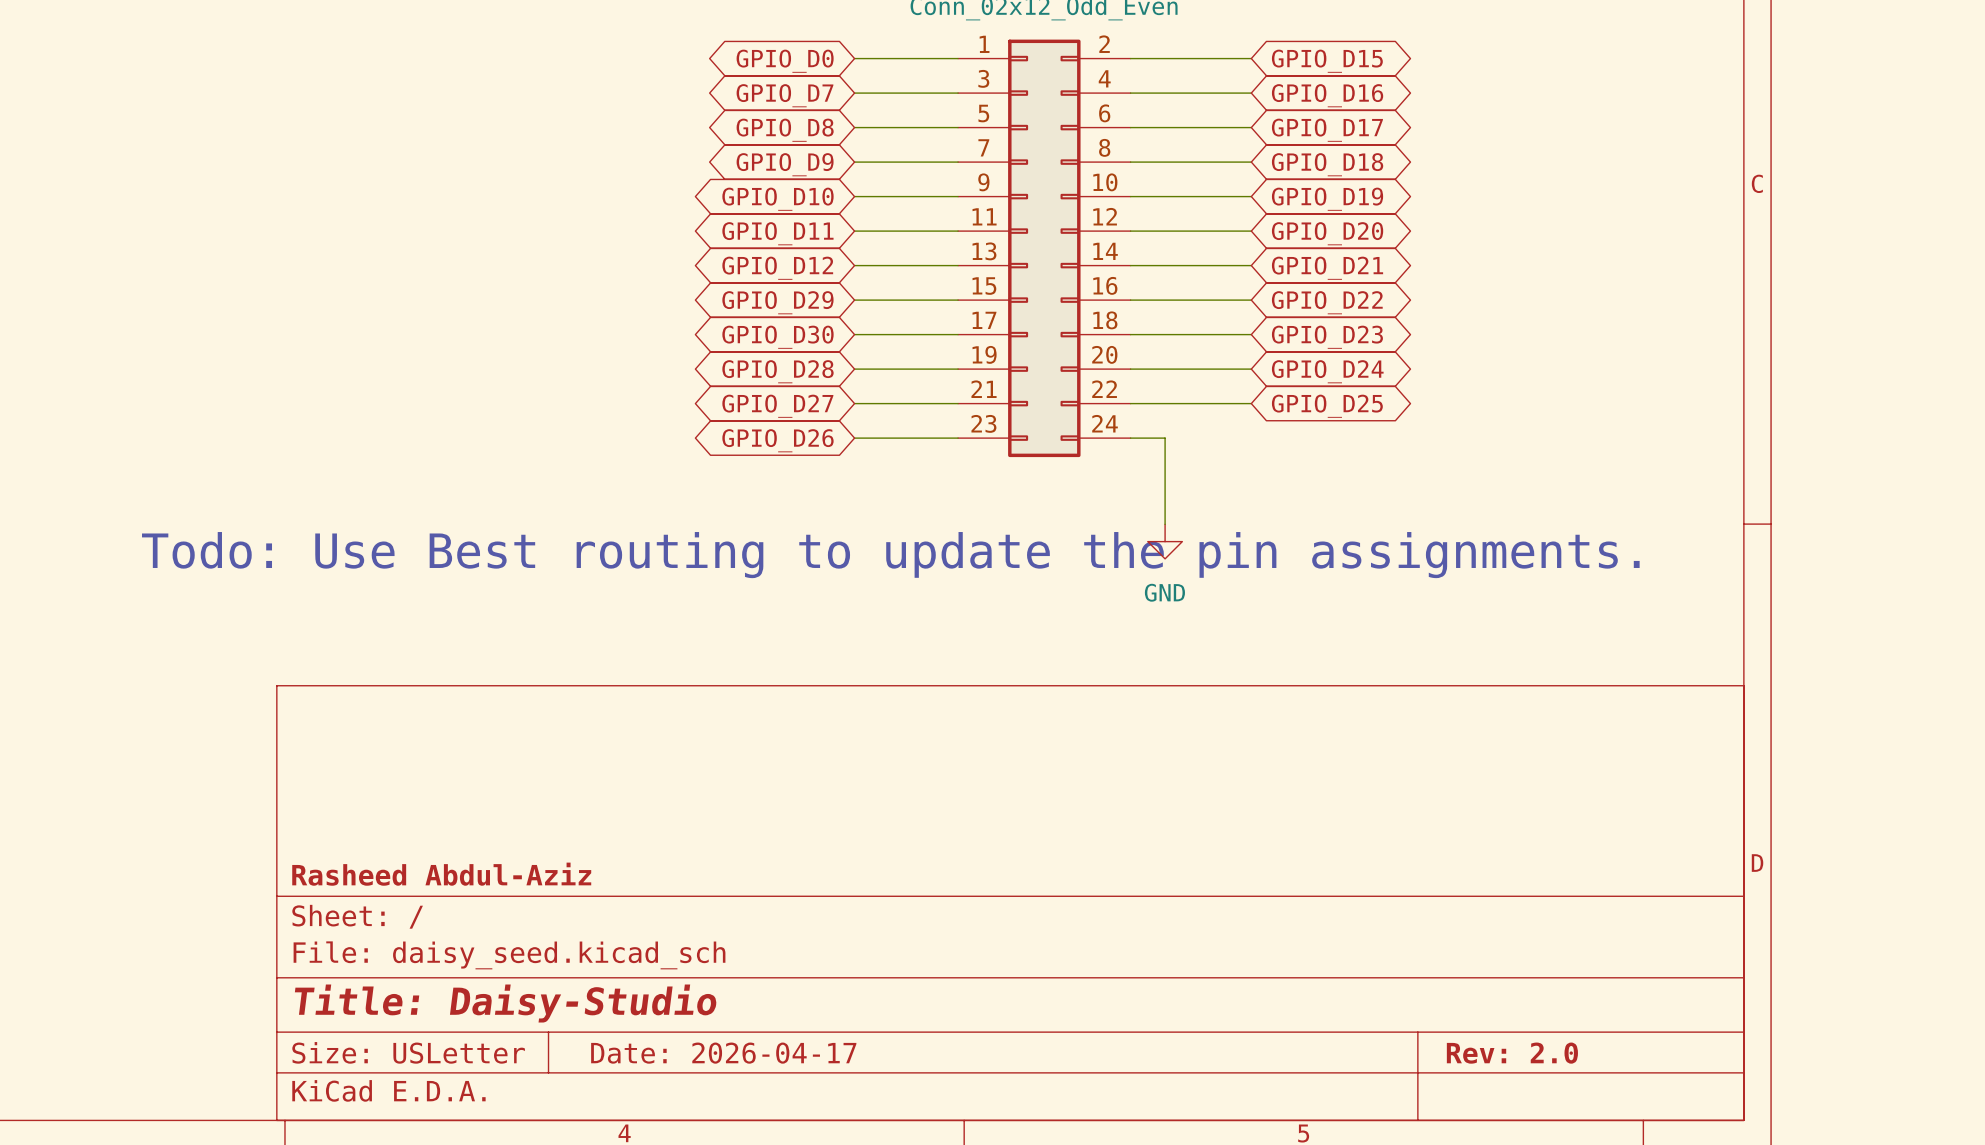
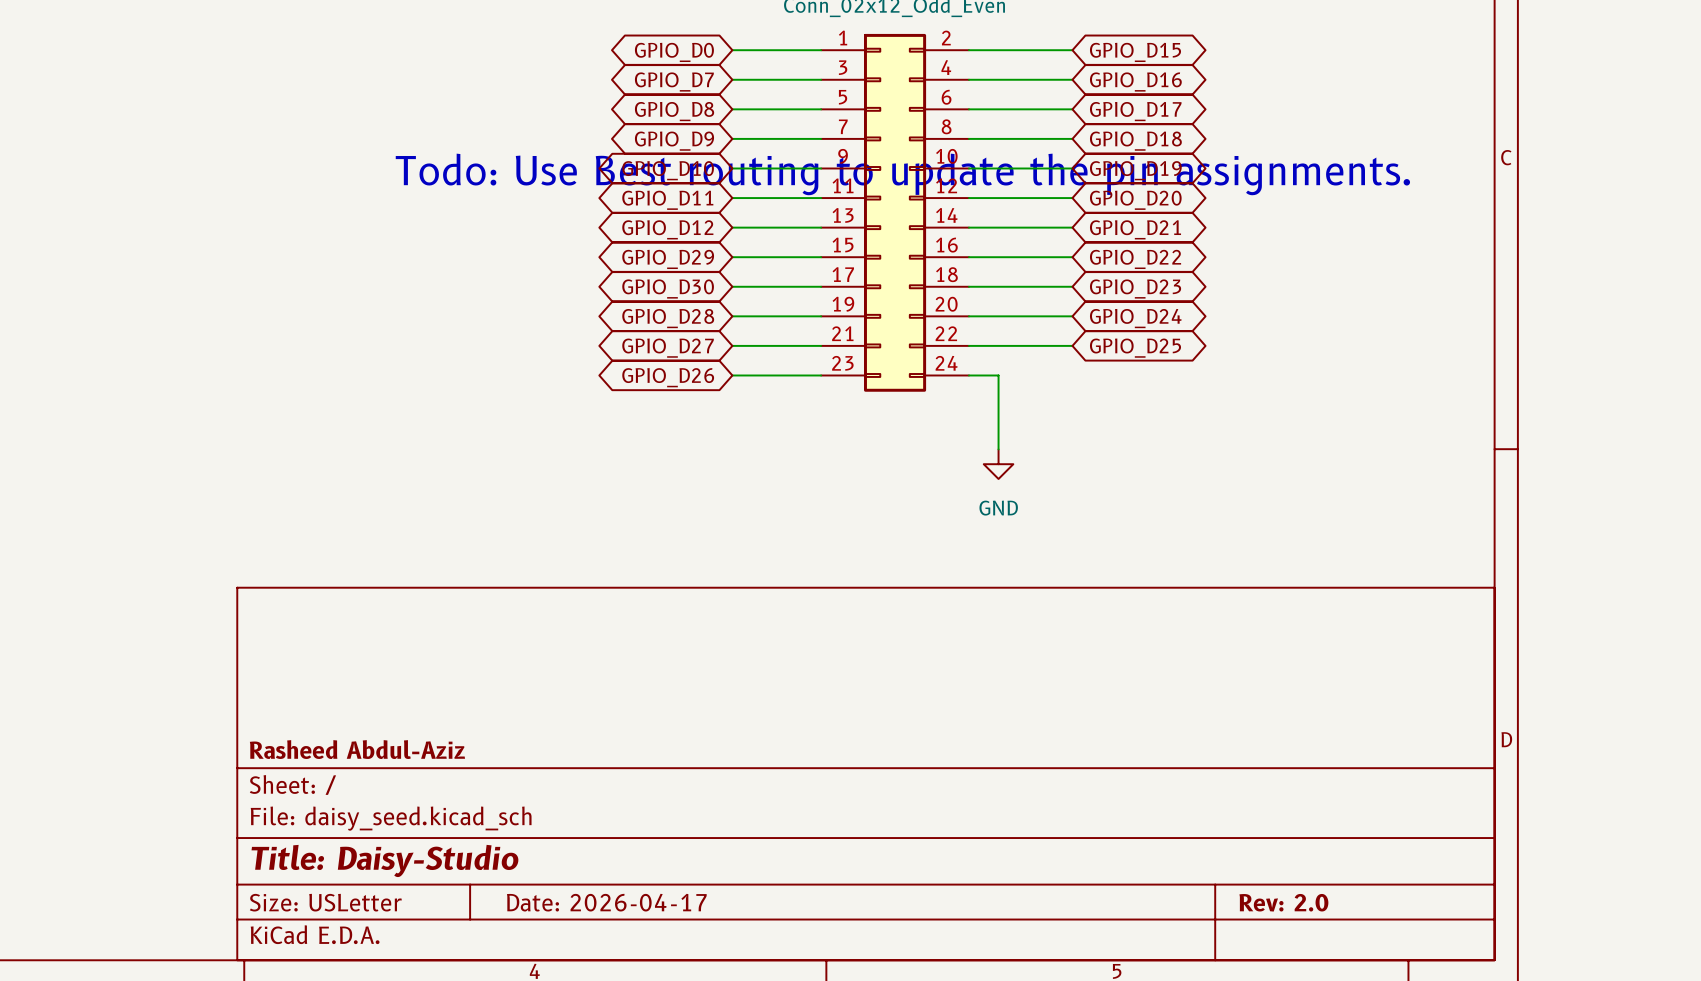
text: none -> Todo: Use Best routing to update the pin assignments. (902, 174)
text: Todo: Use Best routing to update the pin assignments. (890, 555) -> none

